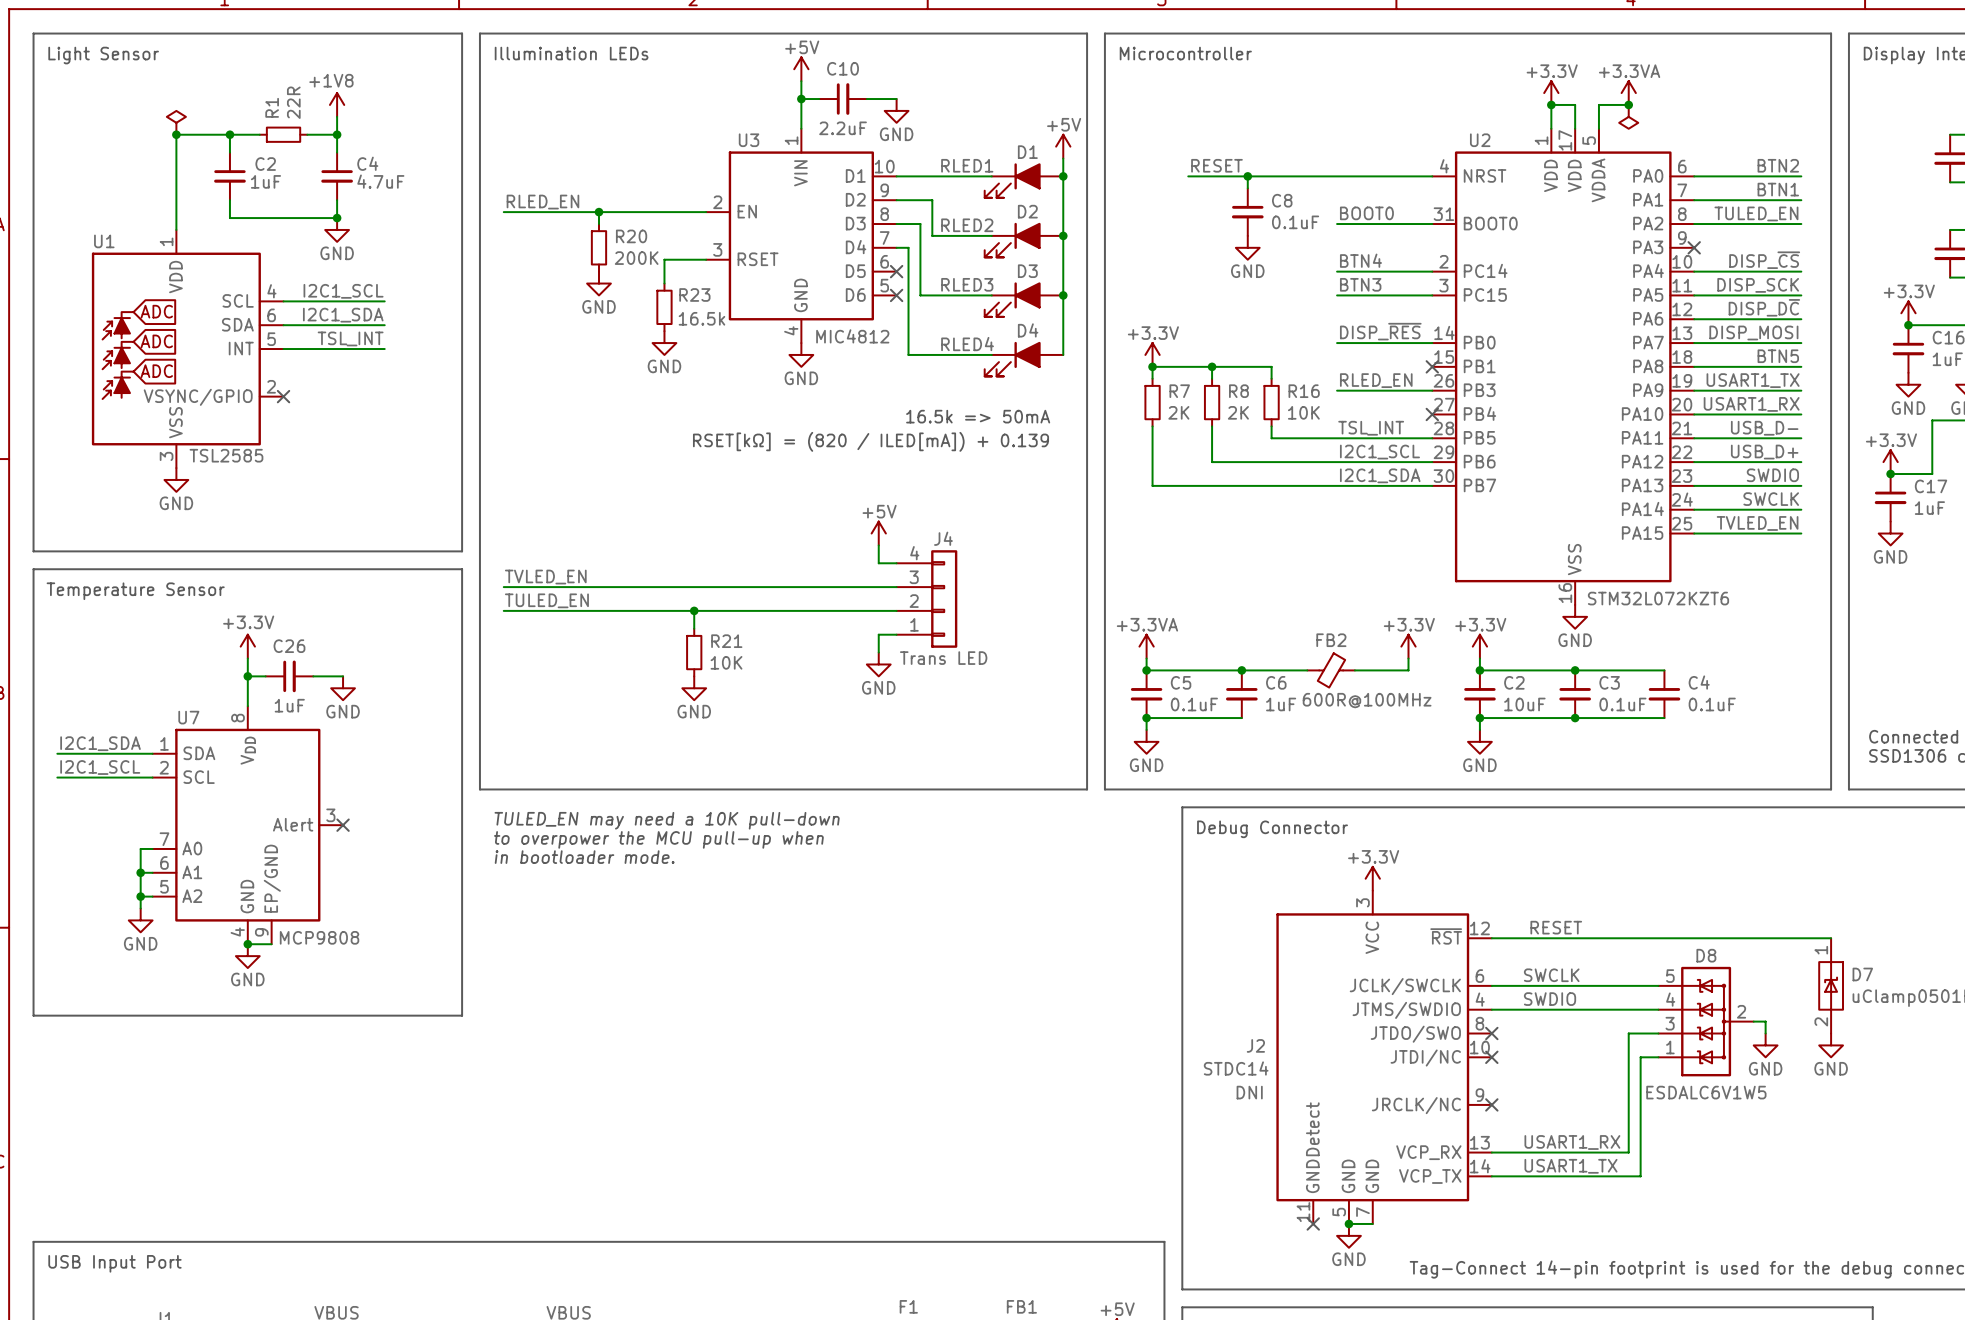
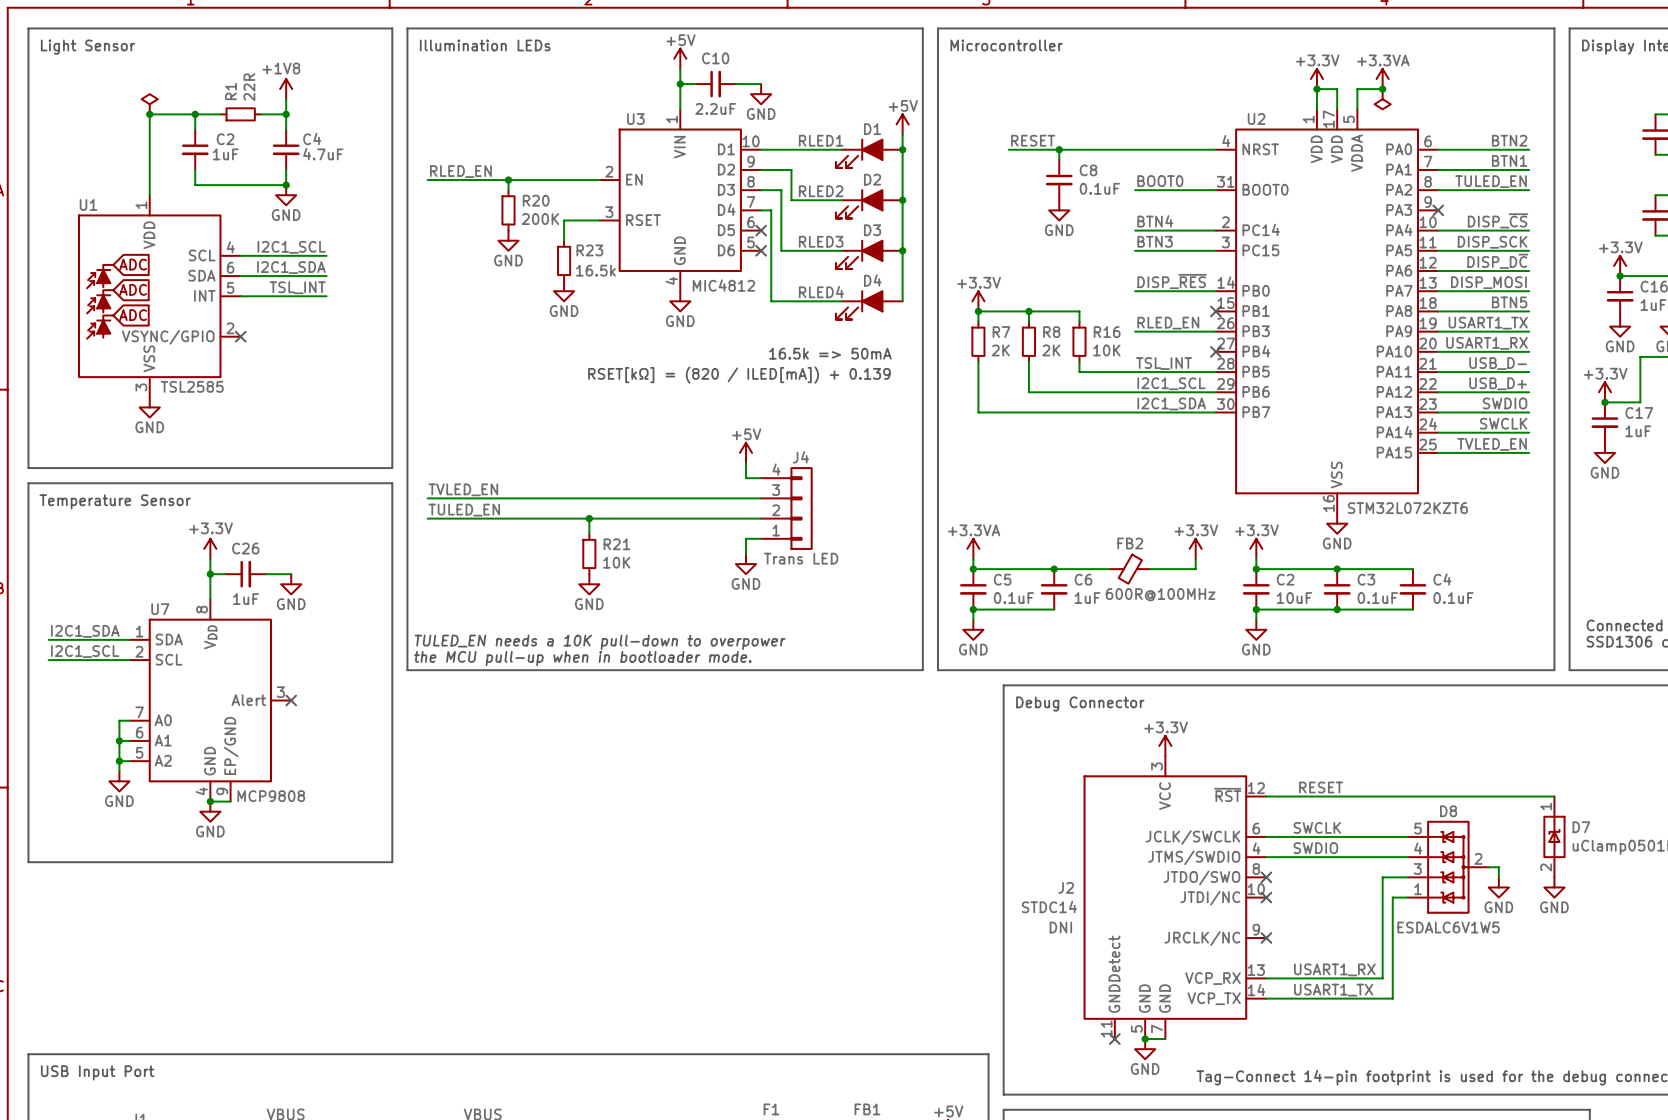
text: none -> TULED_EN needs a 10K pull-down to overpower (600, 642)
text: none -> the MCU pull-up when in bootloader mode. (582, 658)
text: TULED_EN may need a 10K pull-down (667, 820) -> none
text: to overpower the MCU pull-up when (658, 839) -> none
text: in bootloader mode. (584, 857) -> none

